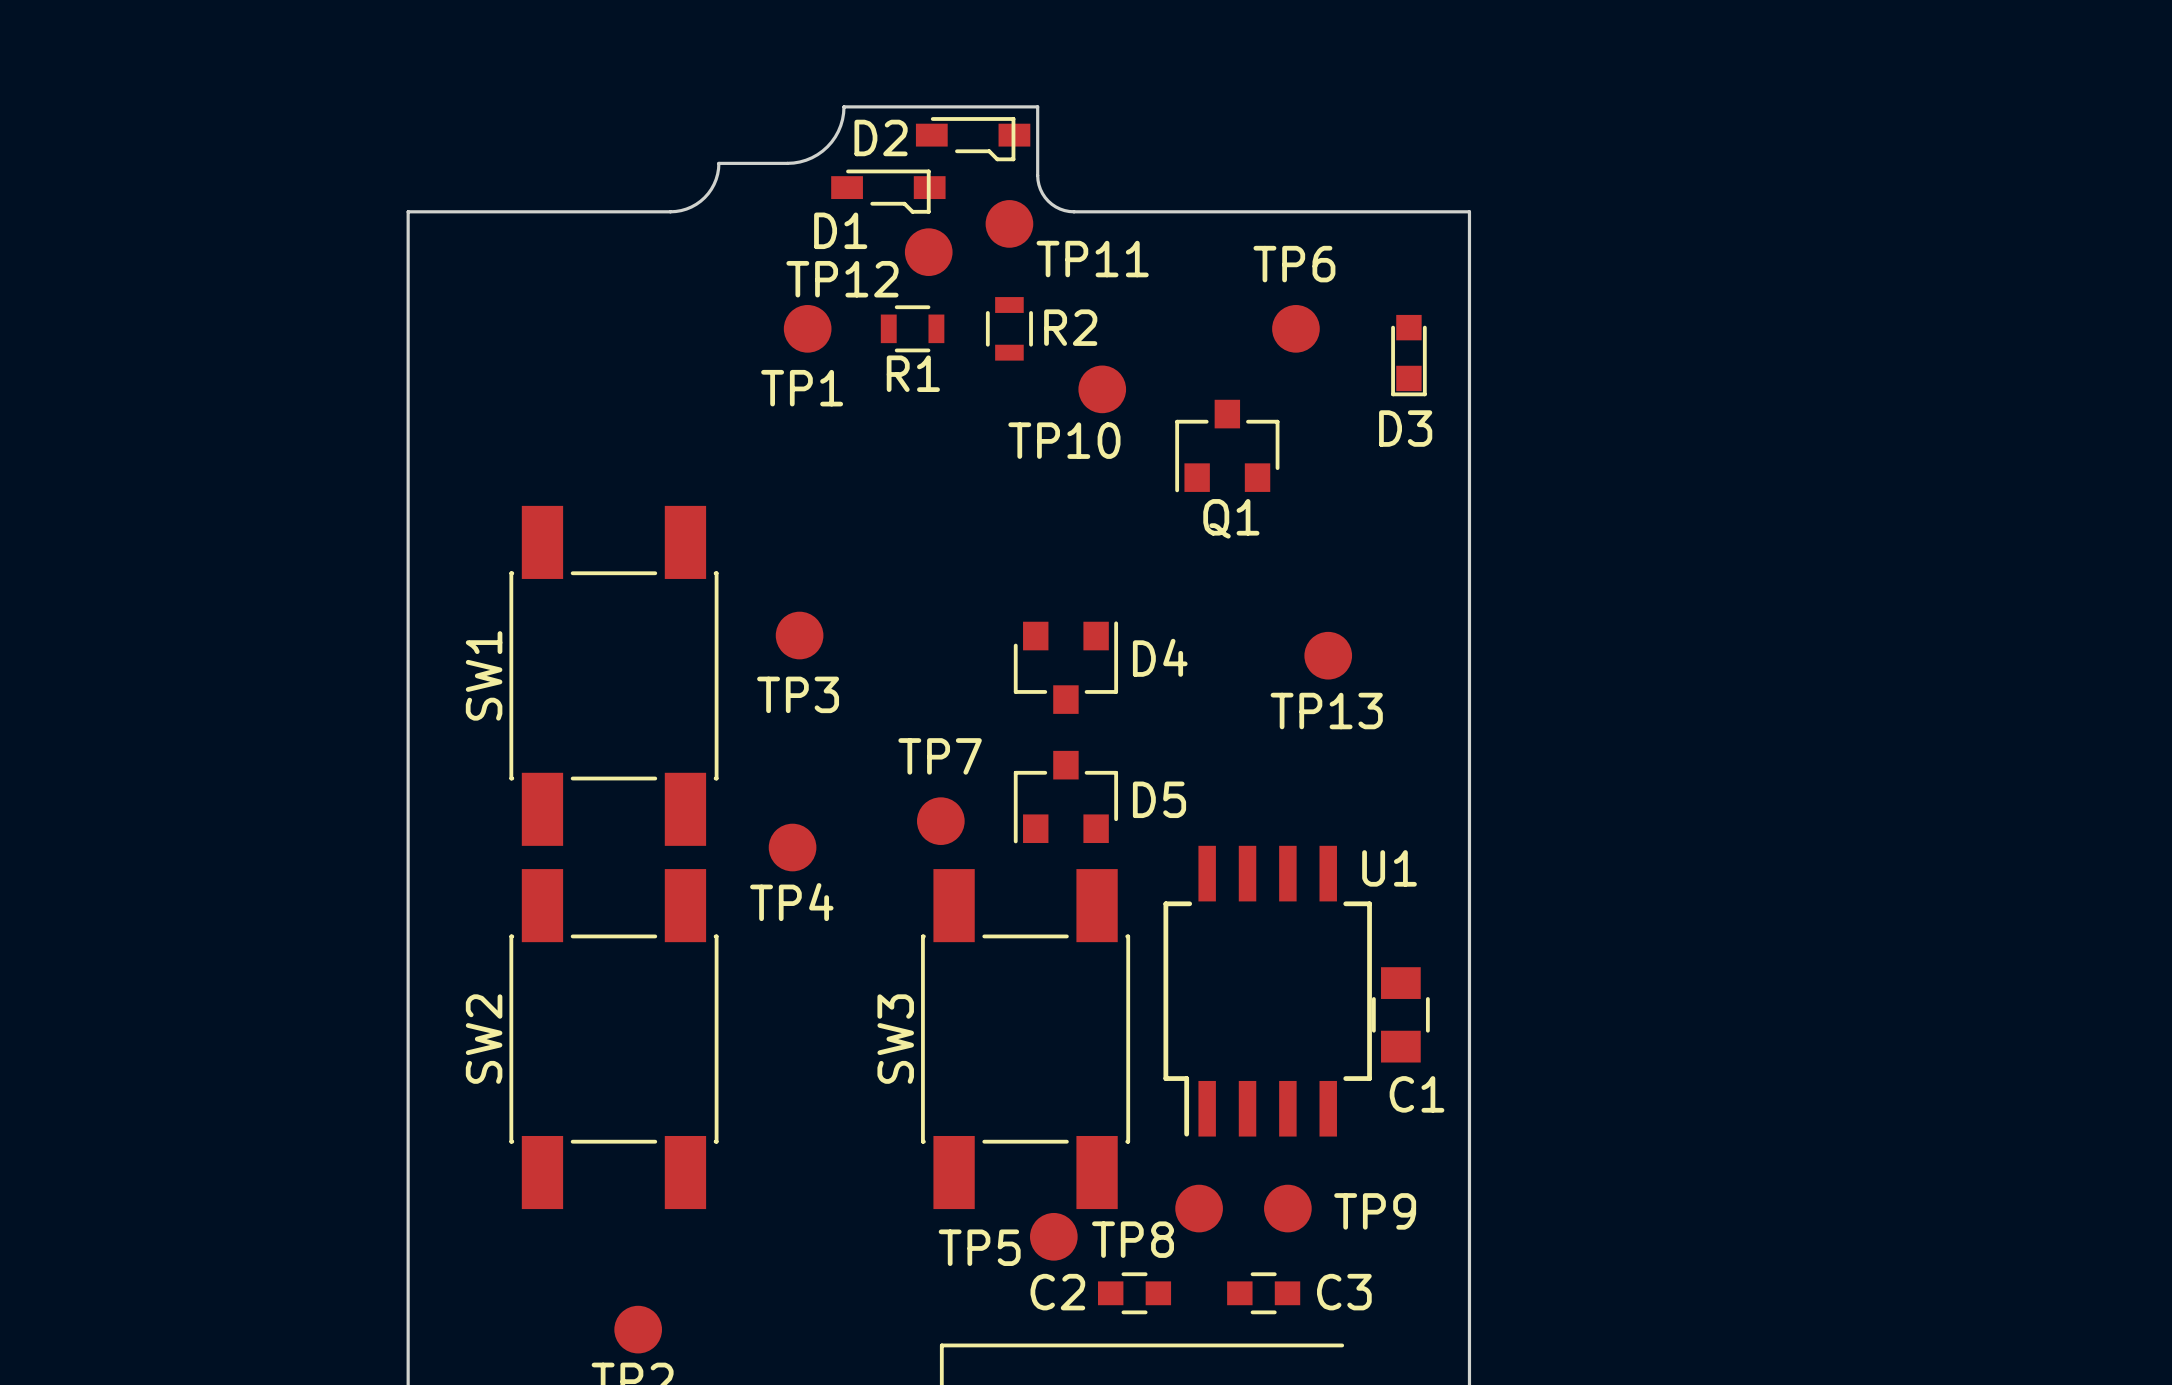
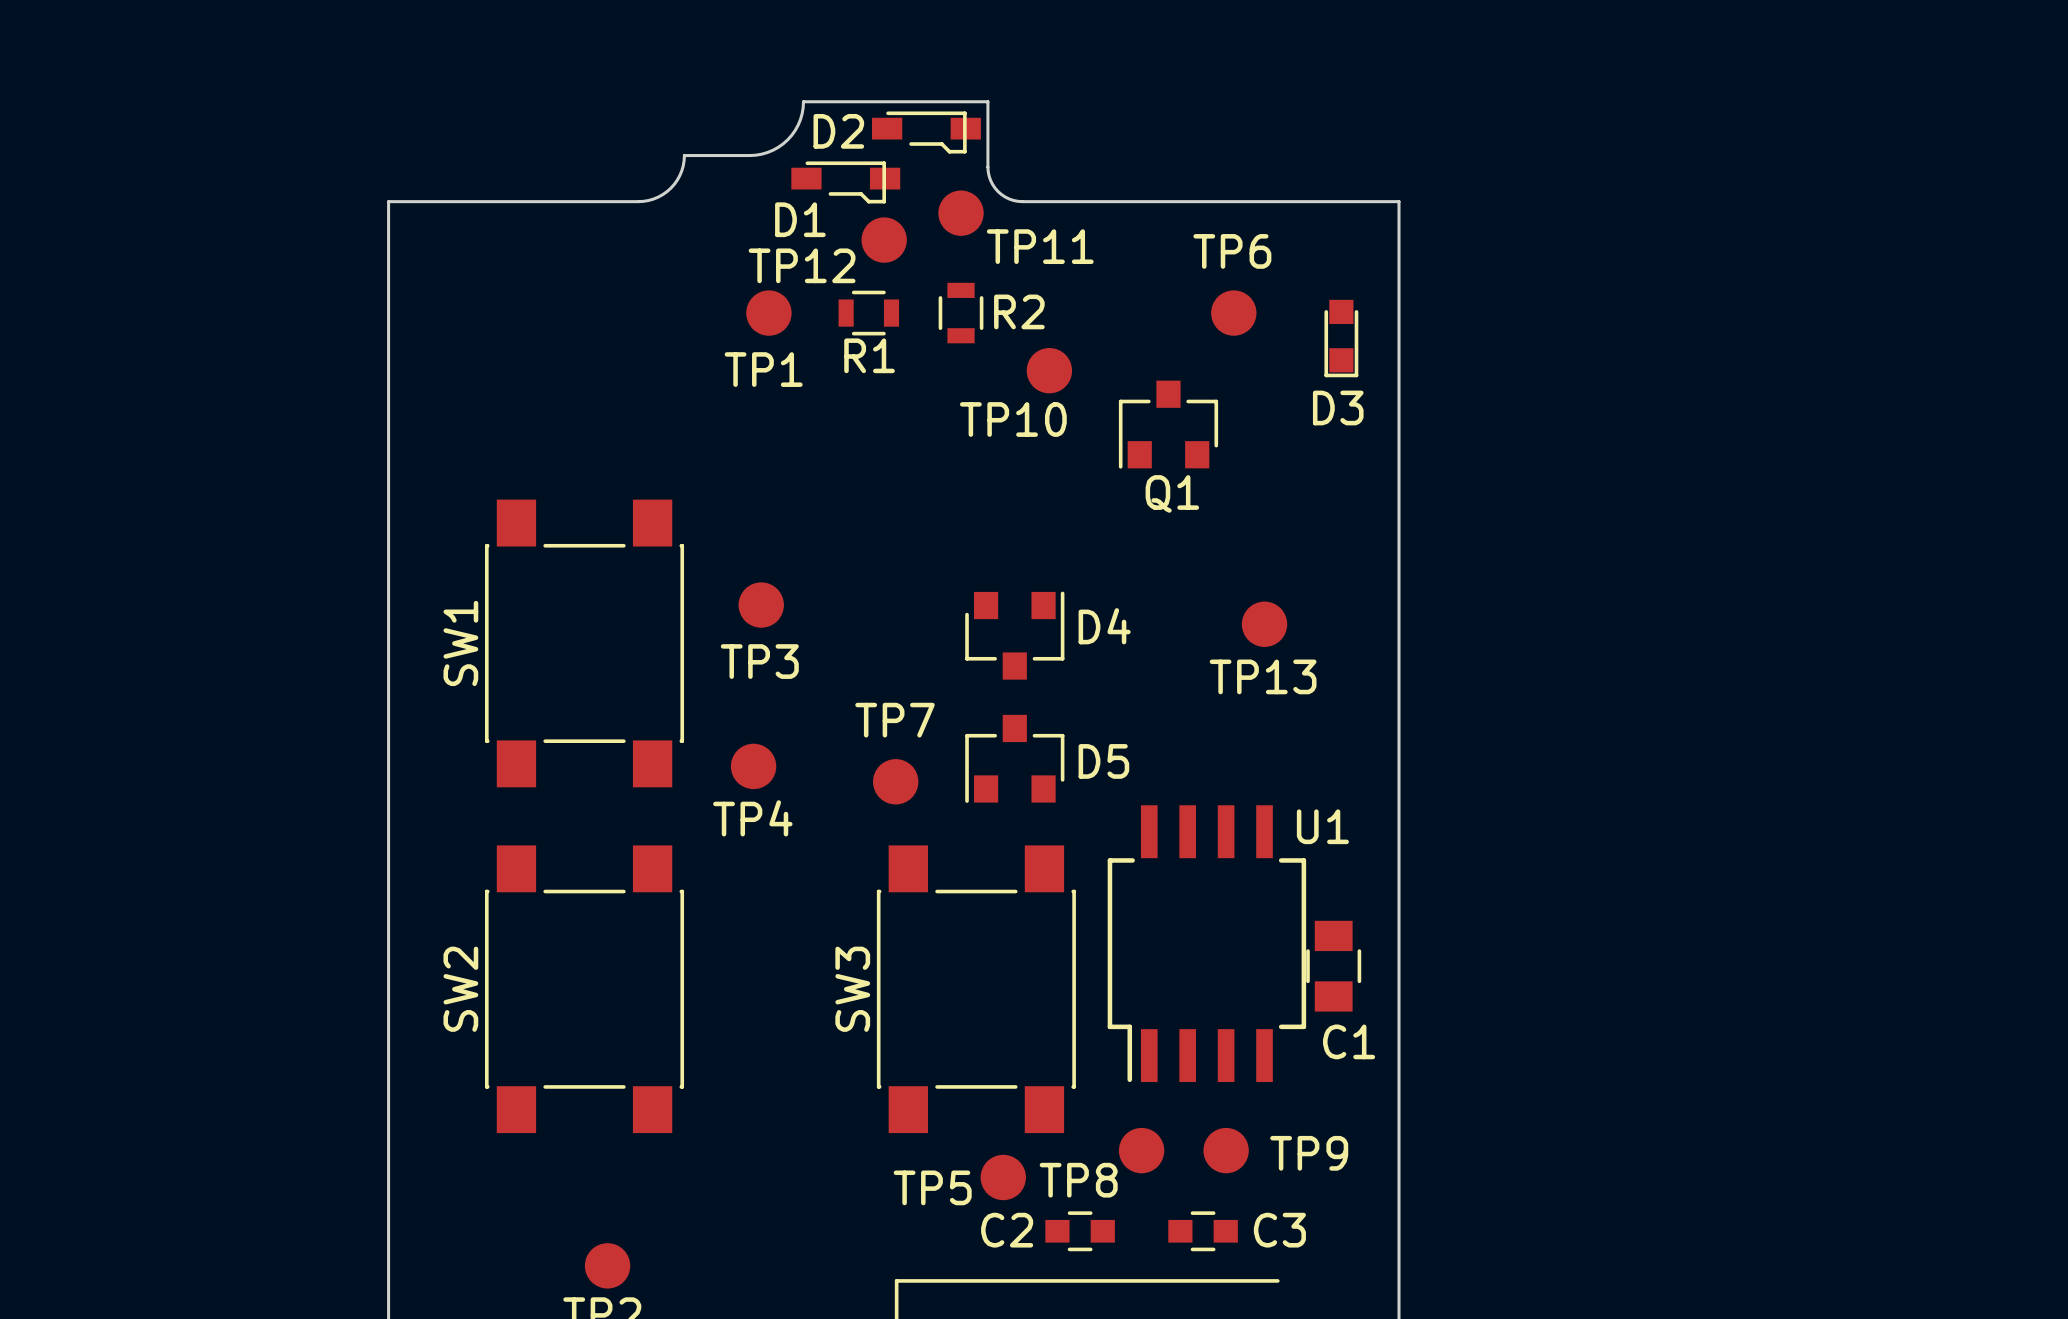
SW1 footprint: [509, 505, 719, 846] -> [484, 499, 685, 788]
TP4 position: (792, 847) -> (753, 766)
SW2 footprint: [509, 869, 719, 1210] -> [484, 845, 685, 1134]
SW3 footprint: [921, 869, 1131, 1210] -> [876, 845, 1076, 1134]

